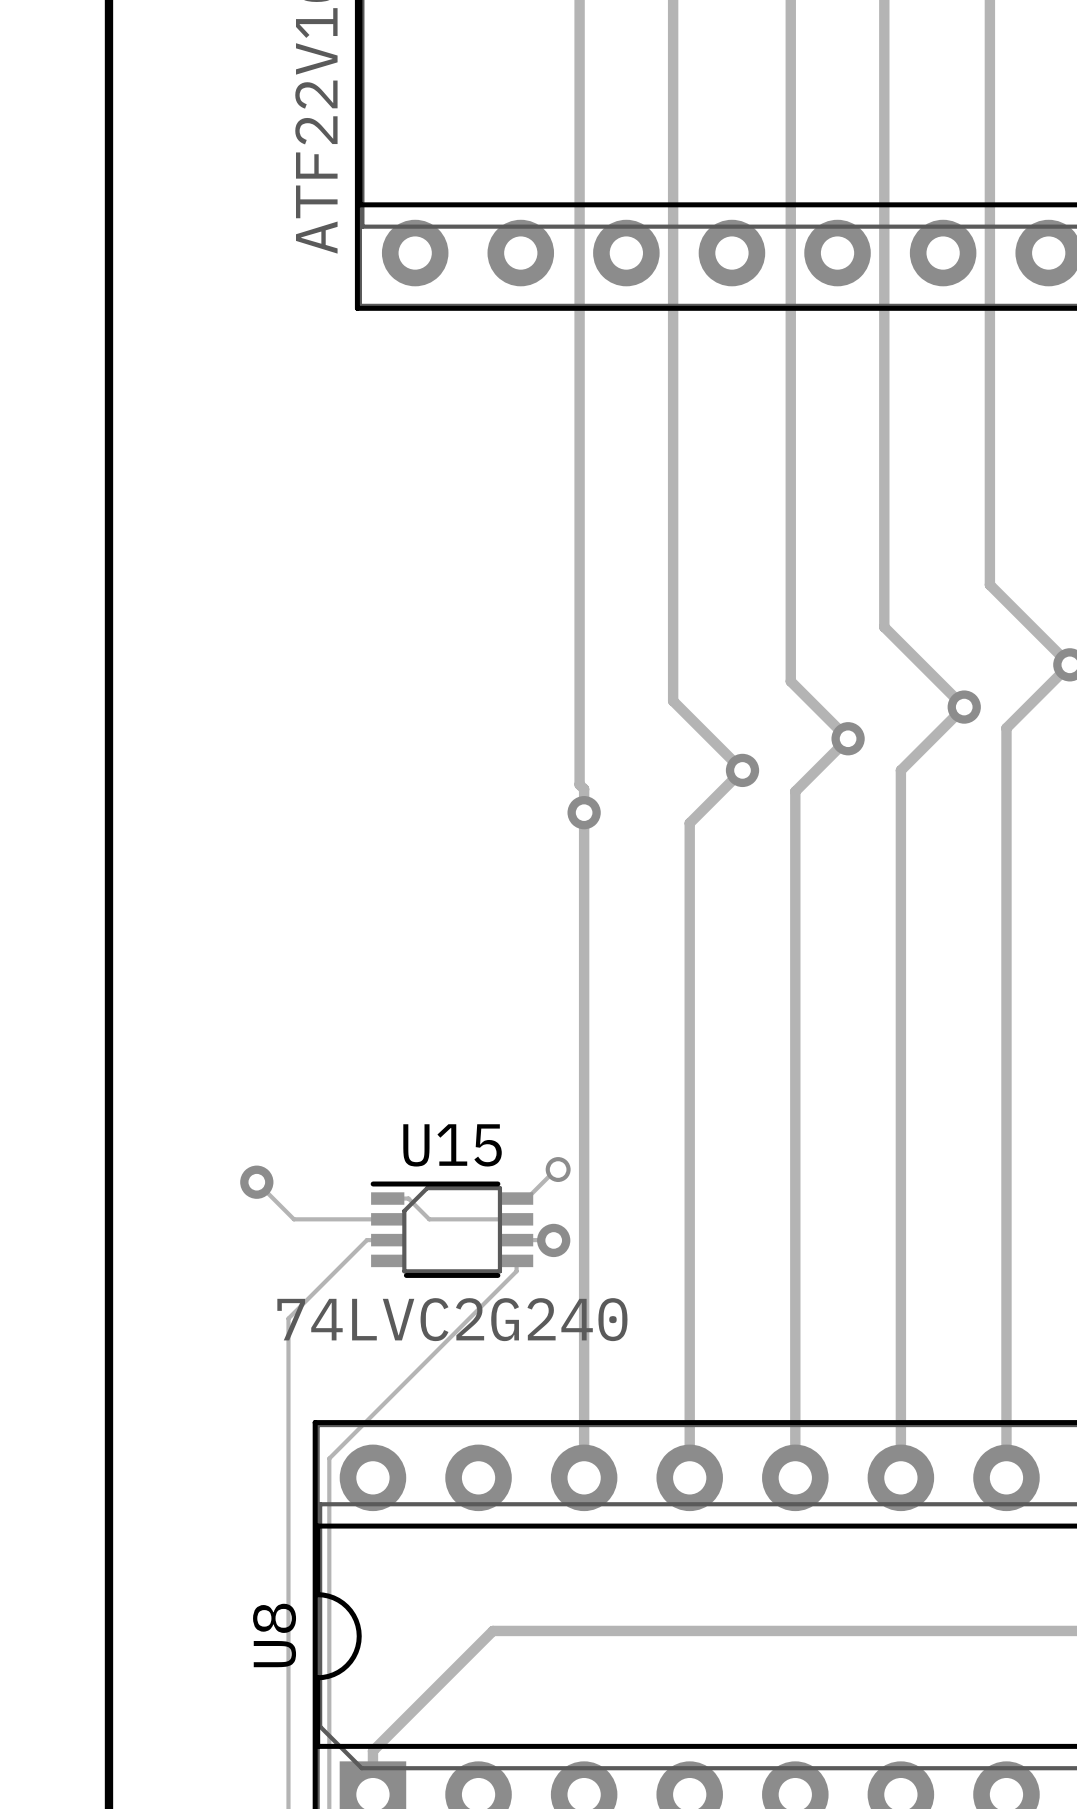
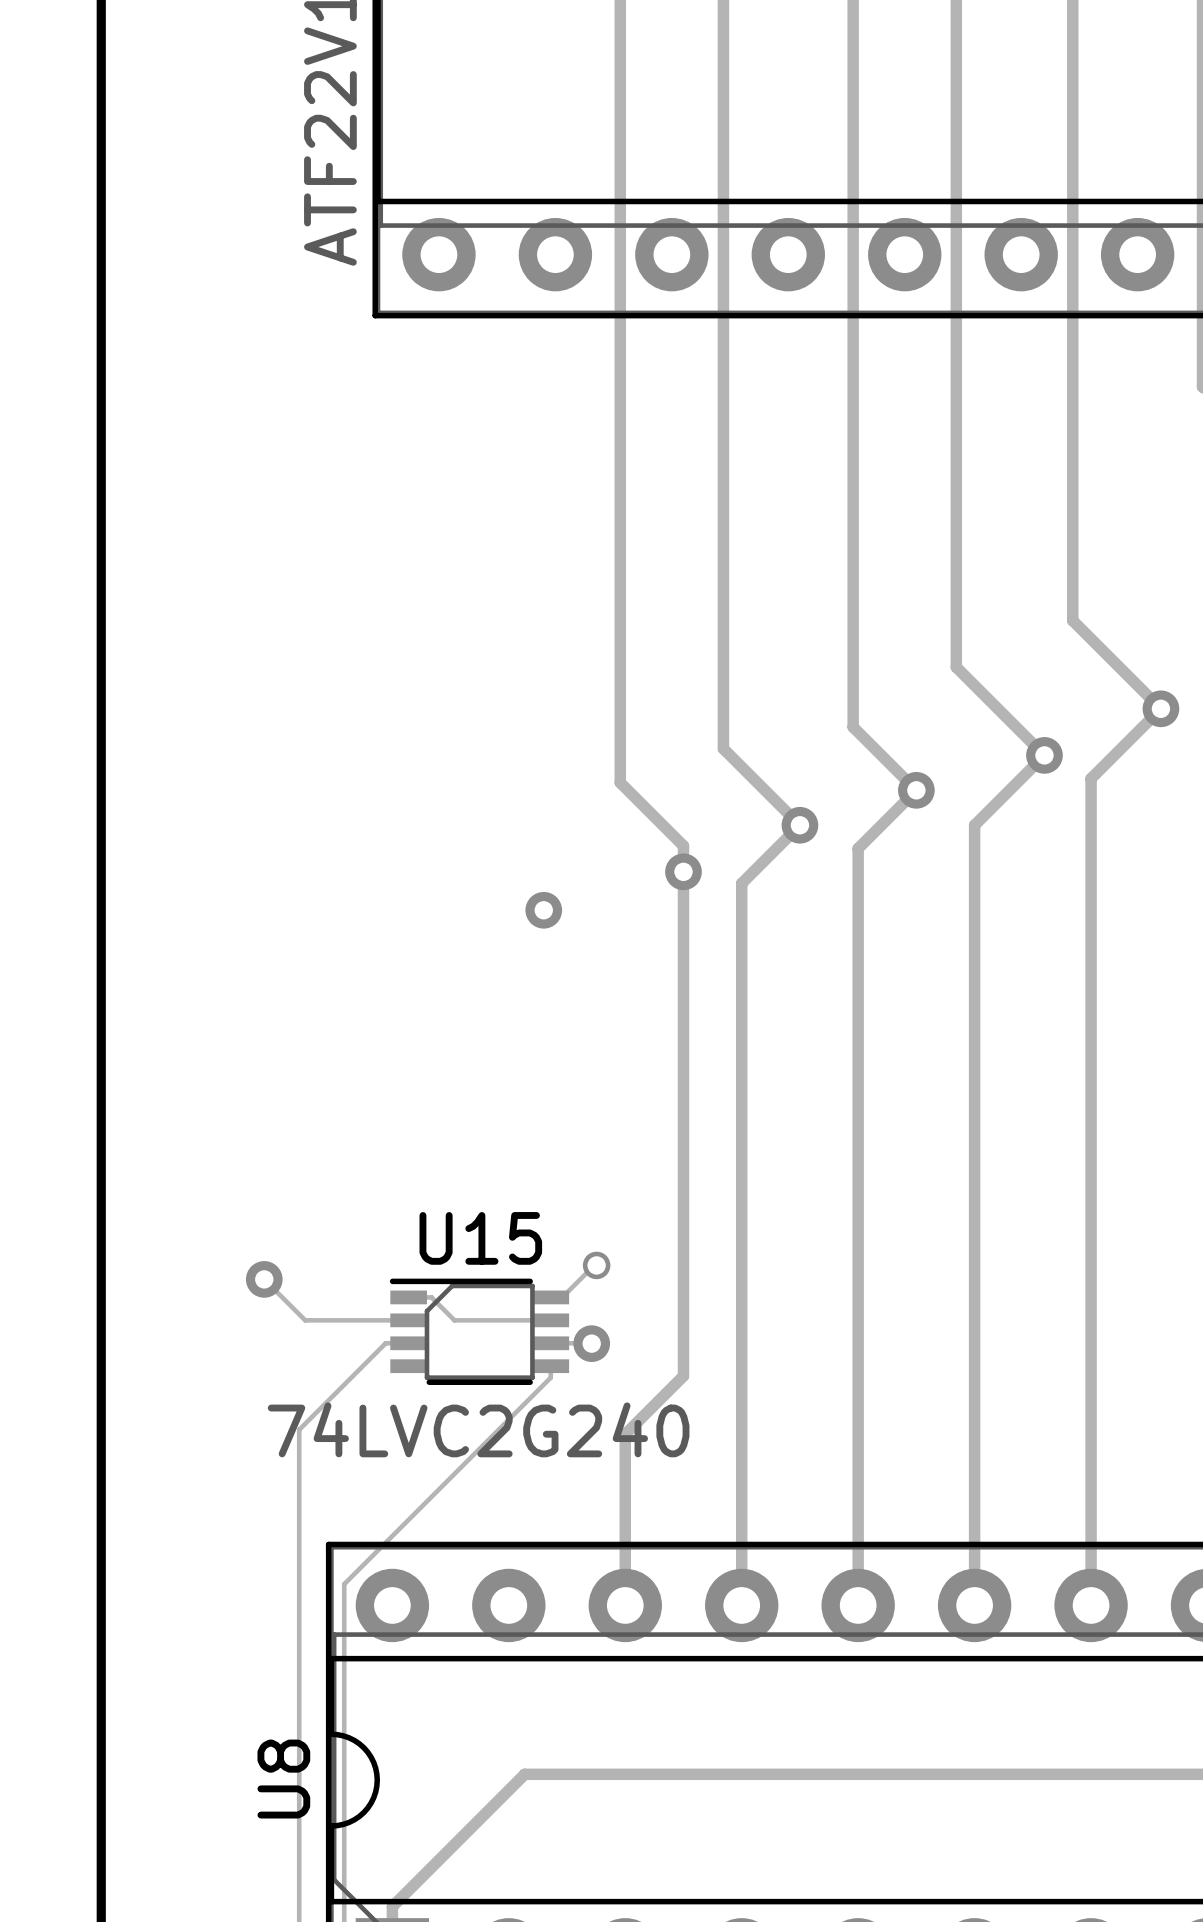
track: (579, 731) (579, 784) (584, 789) (584, 1322) -> (620, 782) (683, 845) (683, 1376) (625, 1434)
via: (584, 812) -> none
via: none -> (683, 871)
via: none -> (543, 910)

